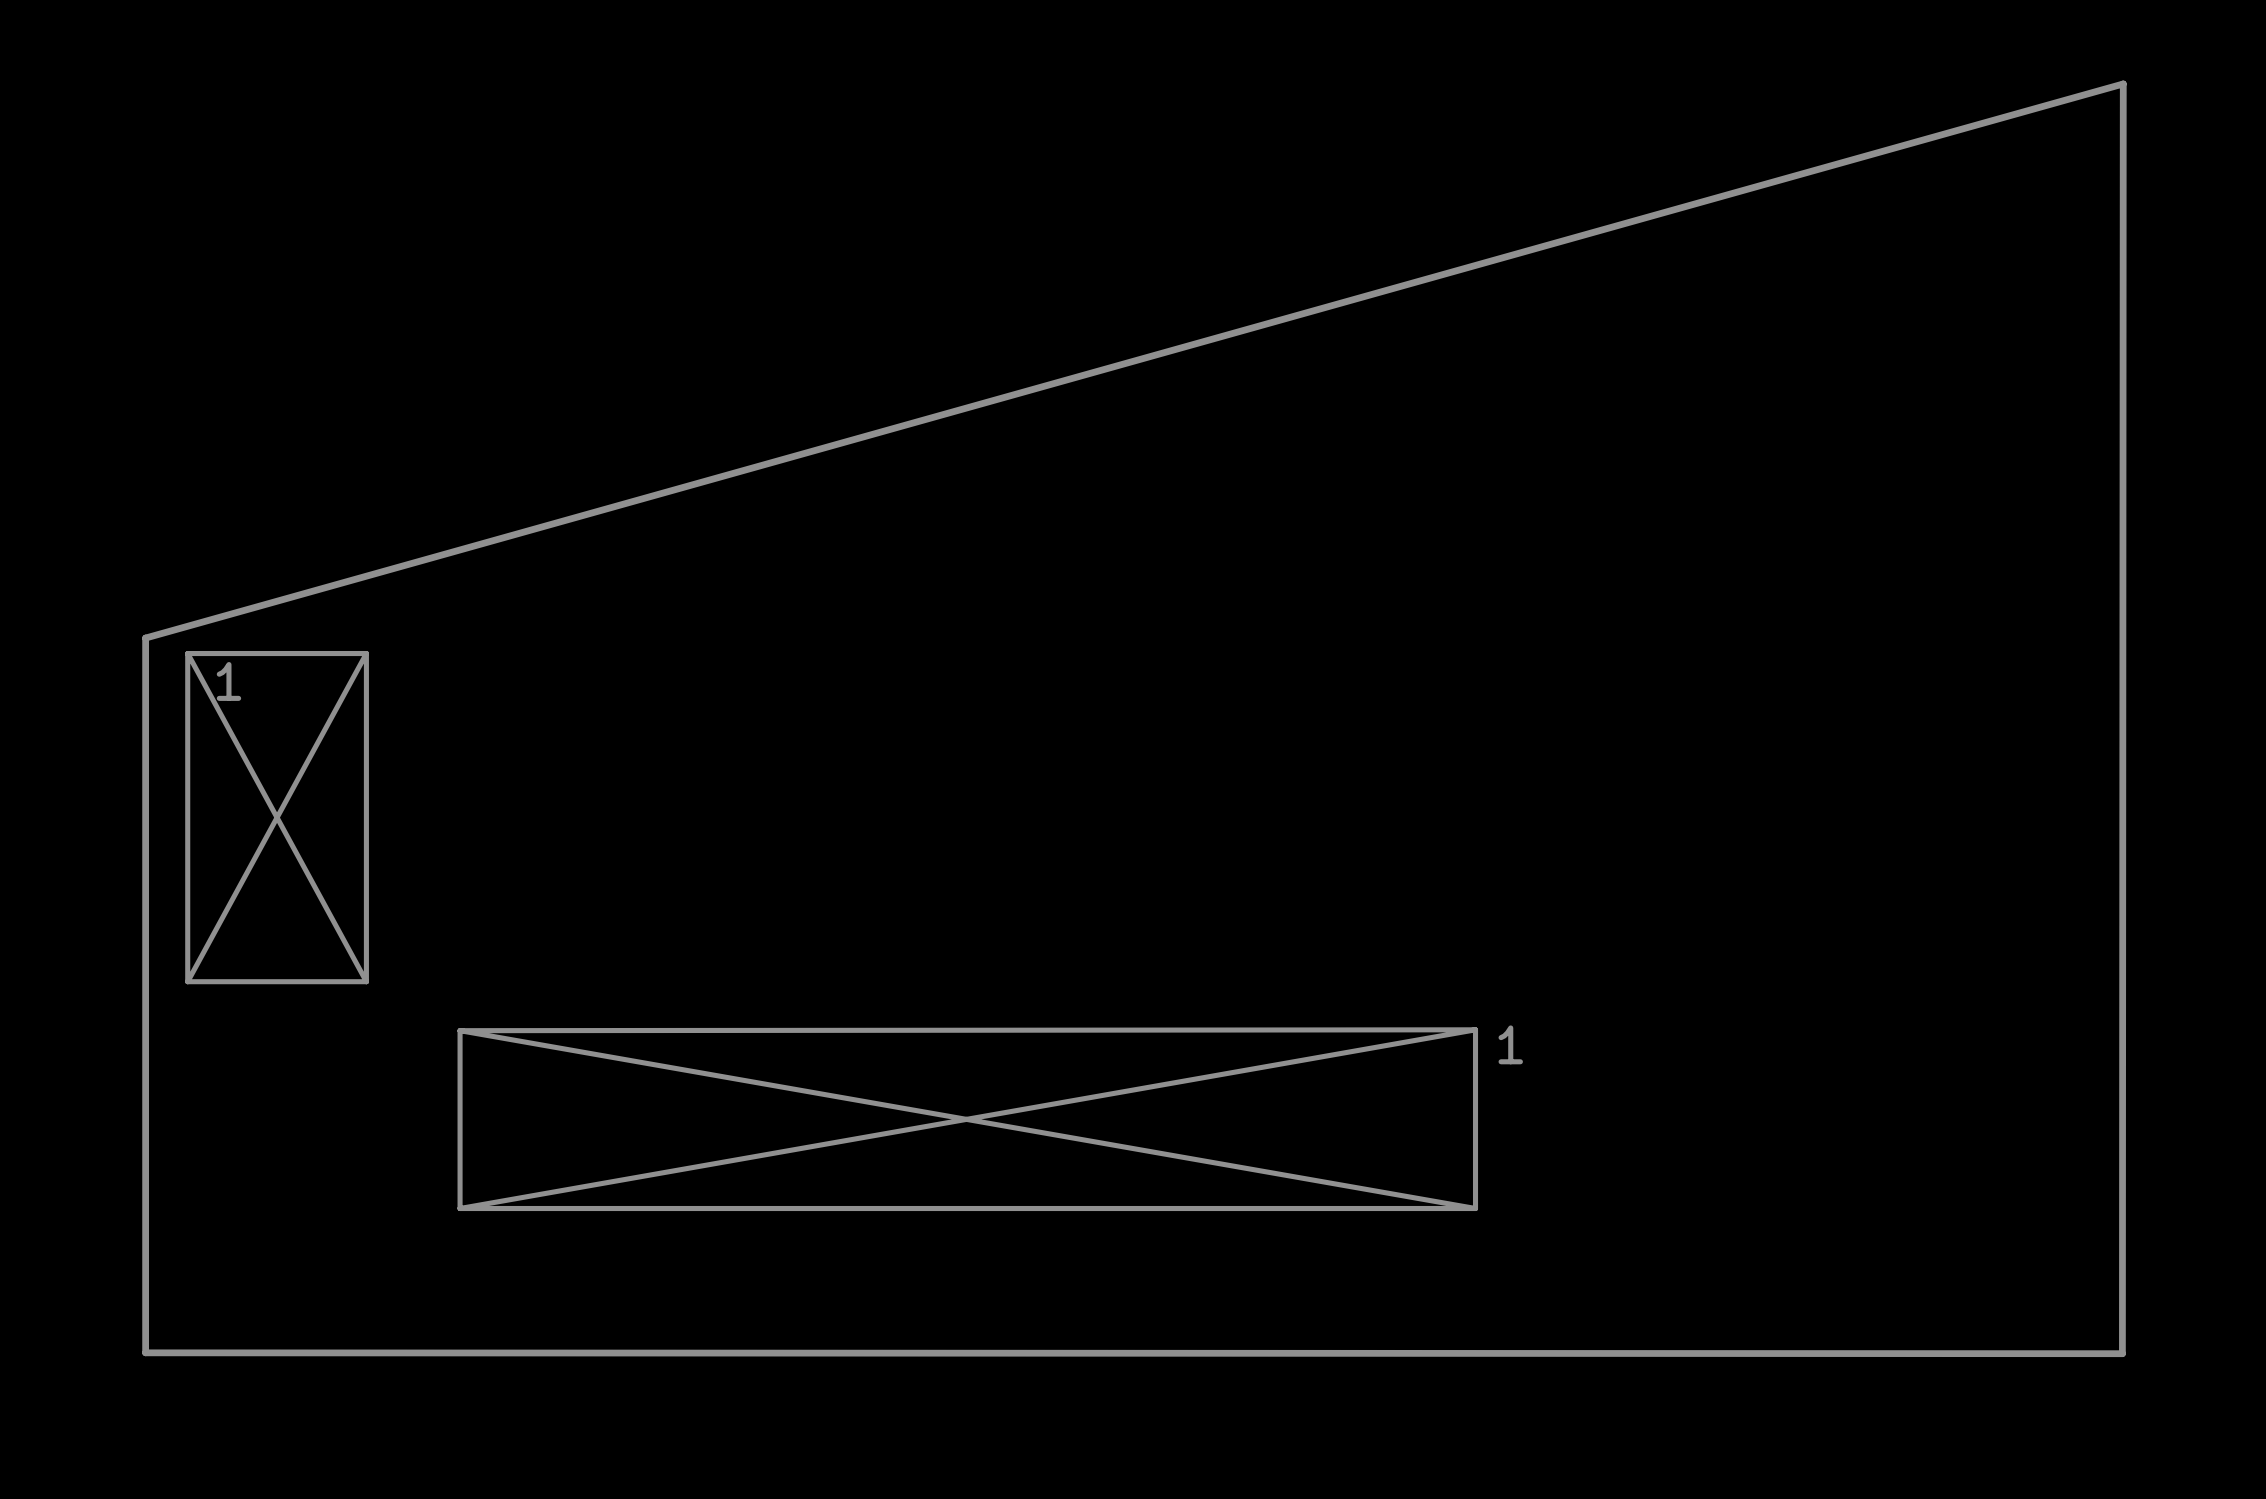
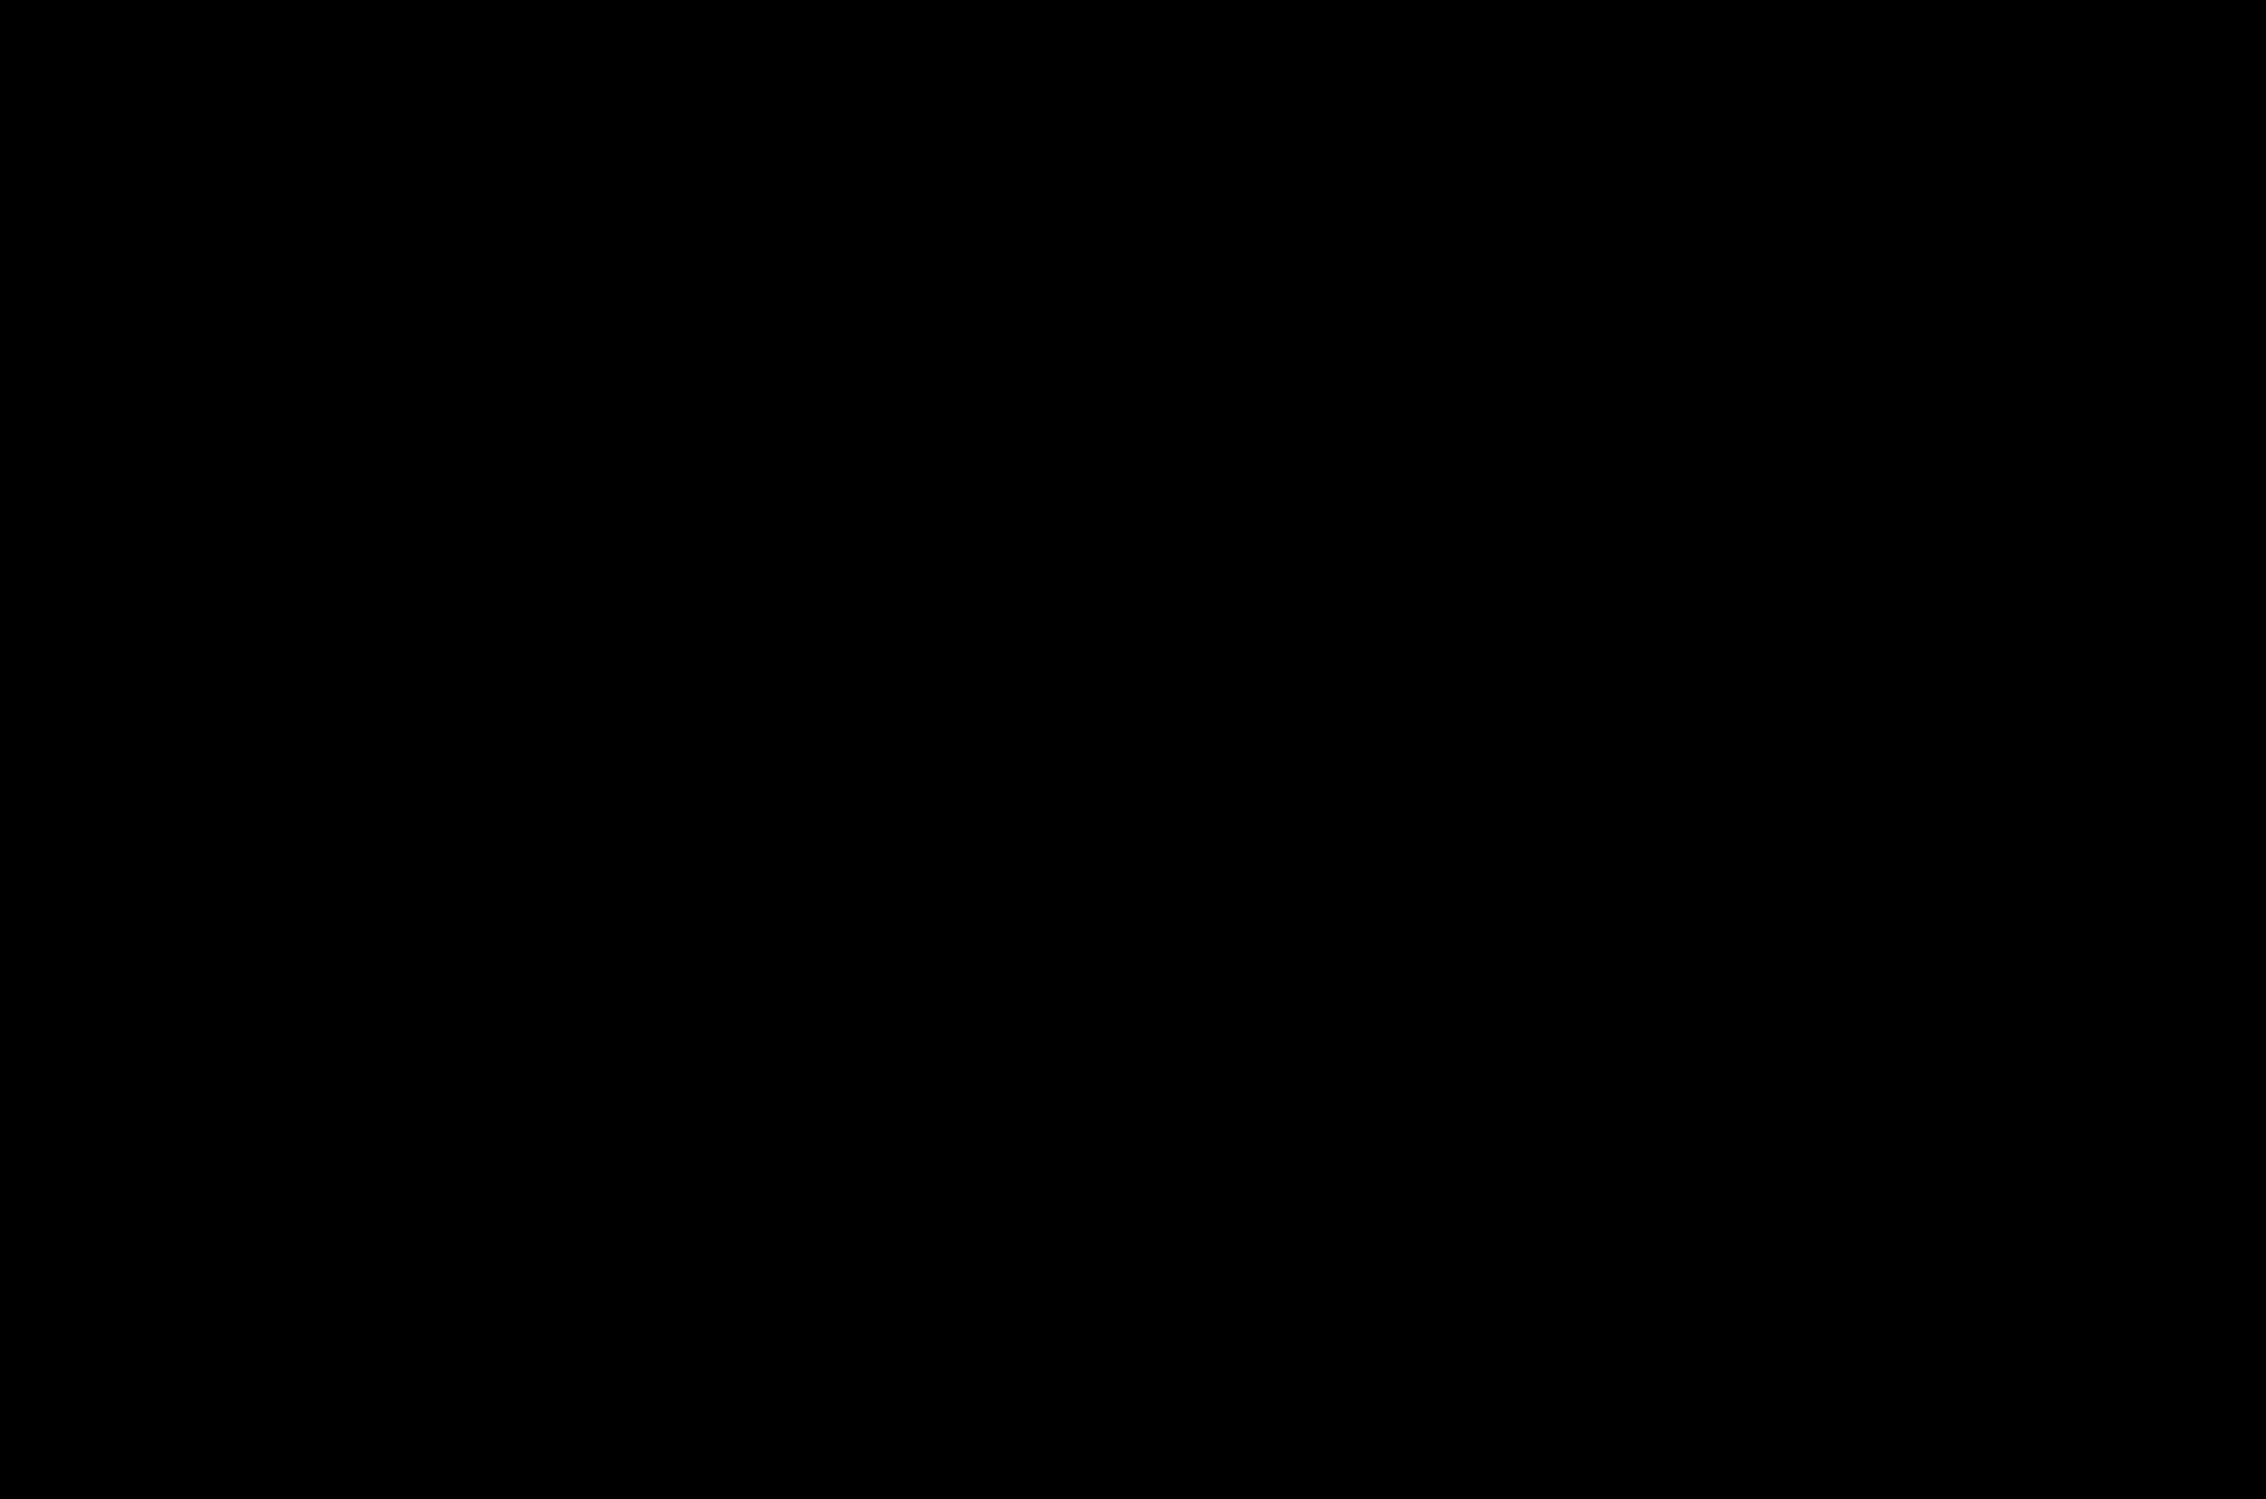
line: (2123, 83) (2122, 1353) (145, 1352) (145, 638) (2123, 83) -> none
line: (187, 653) (187, 981) -> none
line: (187, 653) (366, 653) -> none
line: (187, 653) (366, 981) -> none
line: (366, 653) (366, 981) -> none
line: (366, 653) (187, 981) -> none
text: 1 (228, 681) -> none
line: (187, 981) (366, 981) -> none
line: (1475, 1029) (1475, 1208) -> none
line: (1475, 1029) (460, 1030) -> none
line: (1475, 1029) (460, 1208) -> none
line: (460, 1030) (460, 1208) -> none
line: (460, 1030) (1475, 1208) -> none
text: 1 (1510, 1044) -> none
line: (460, 1208) (1475, 1208) -> none

